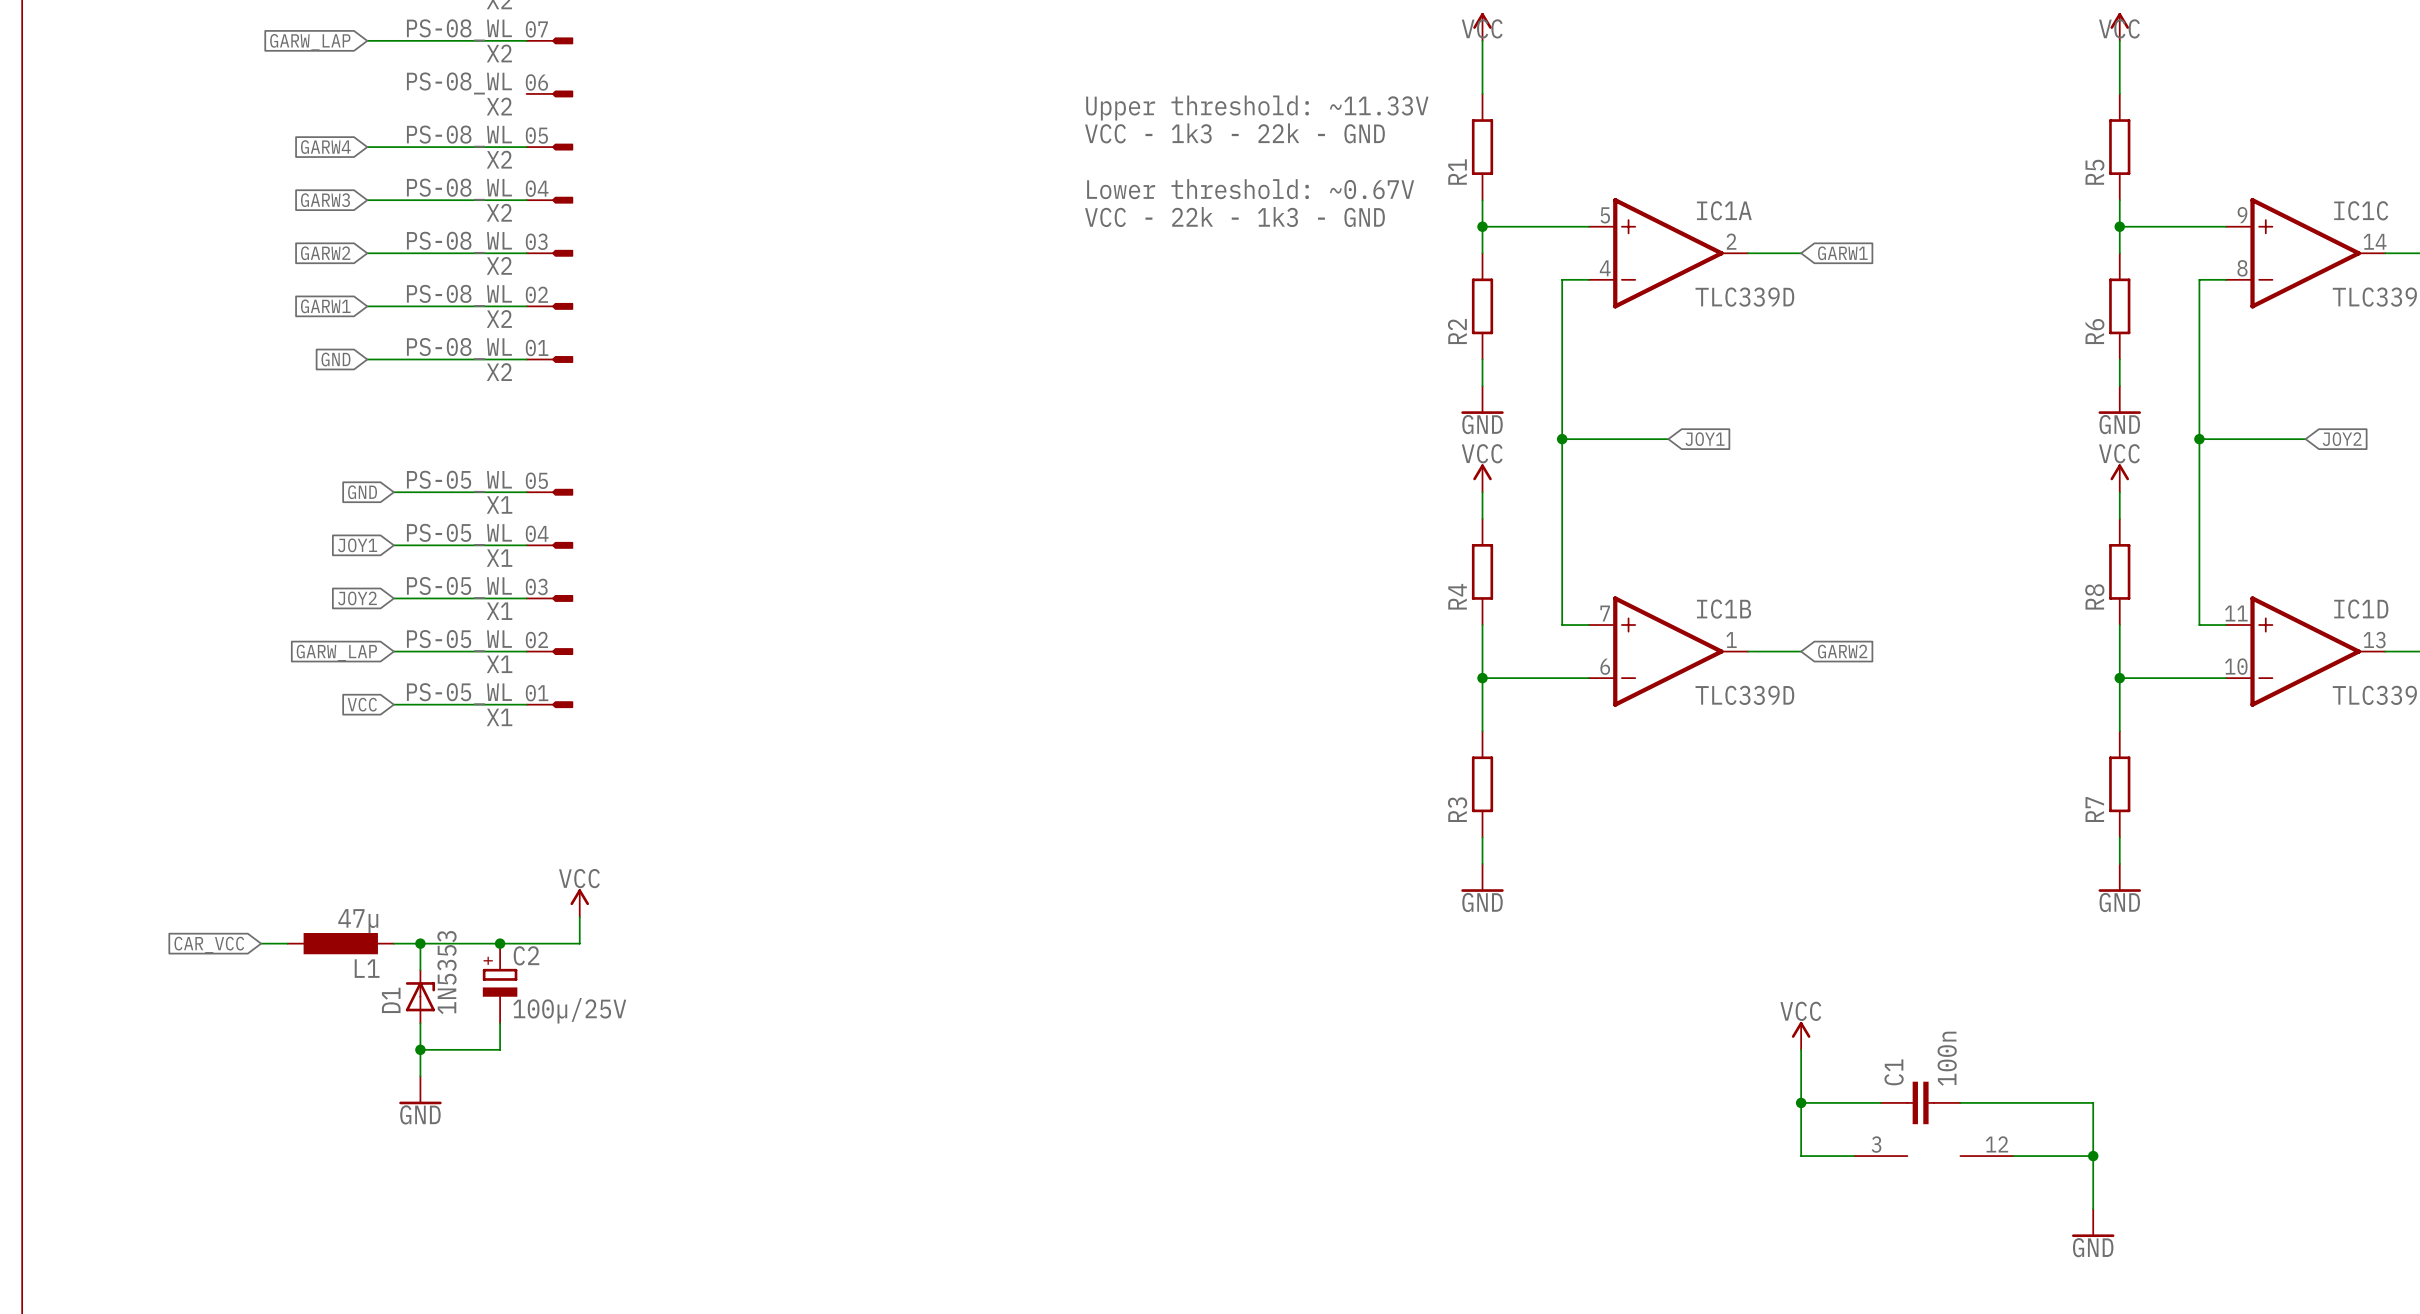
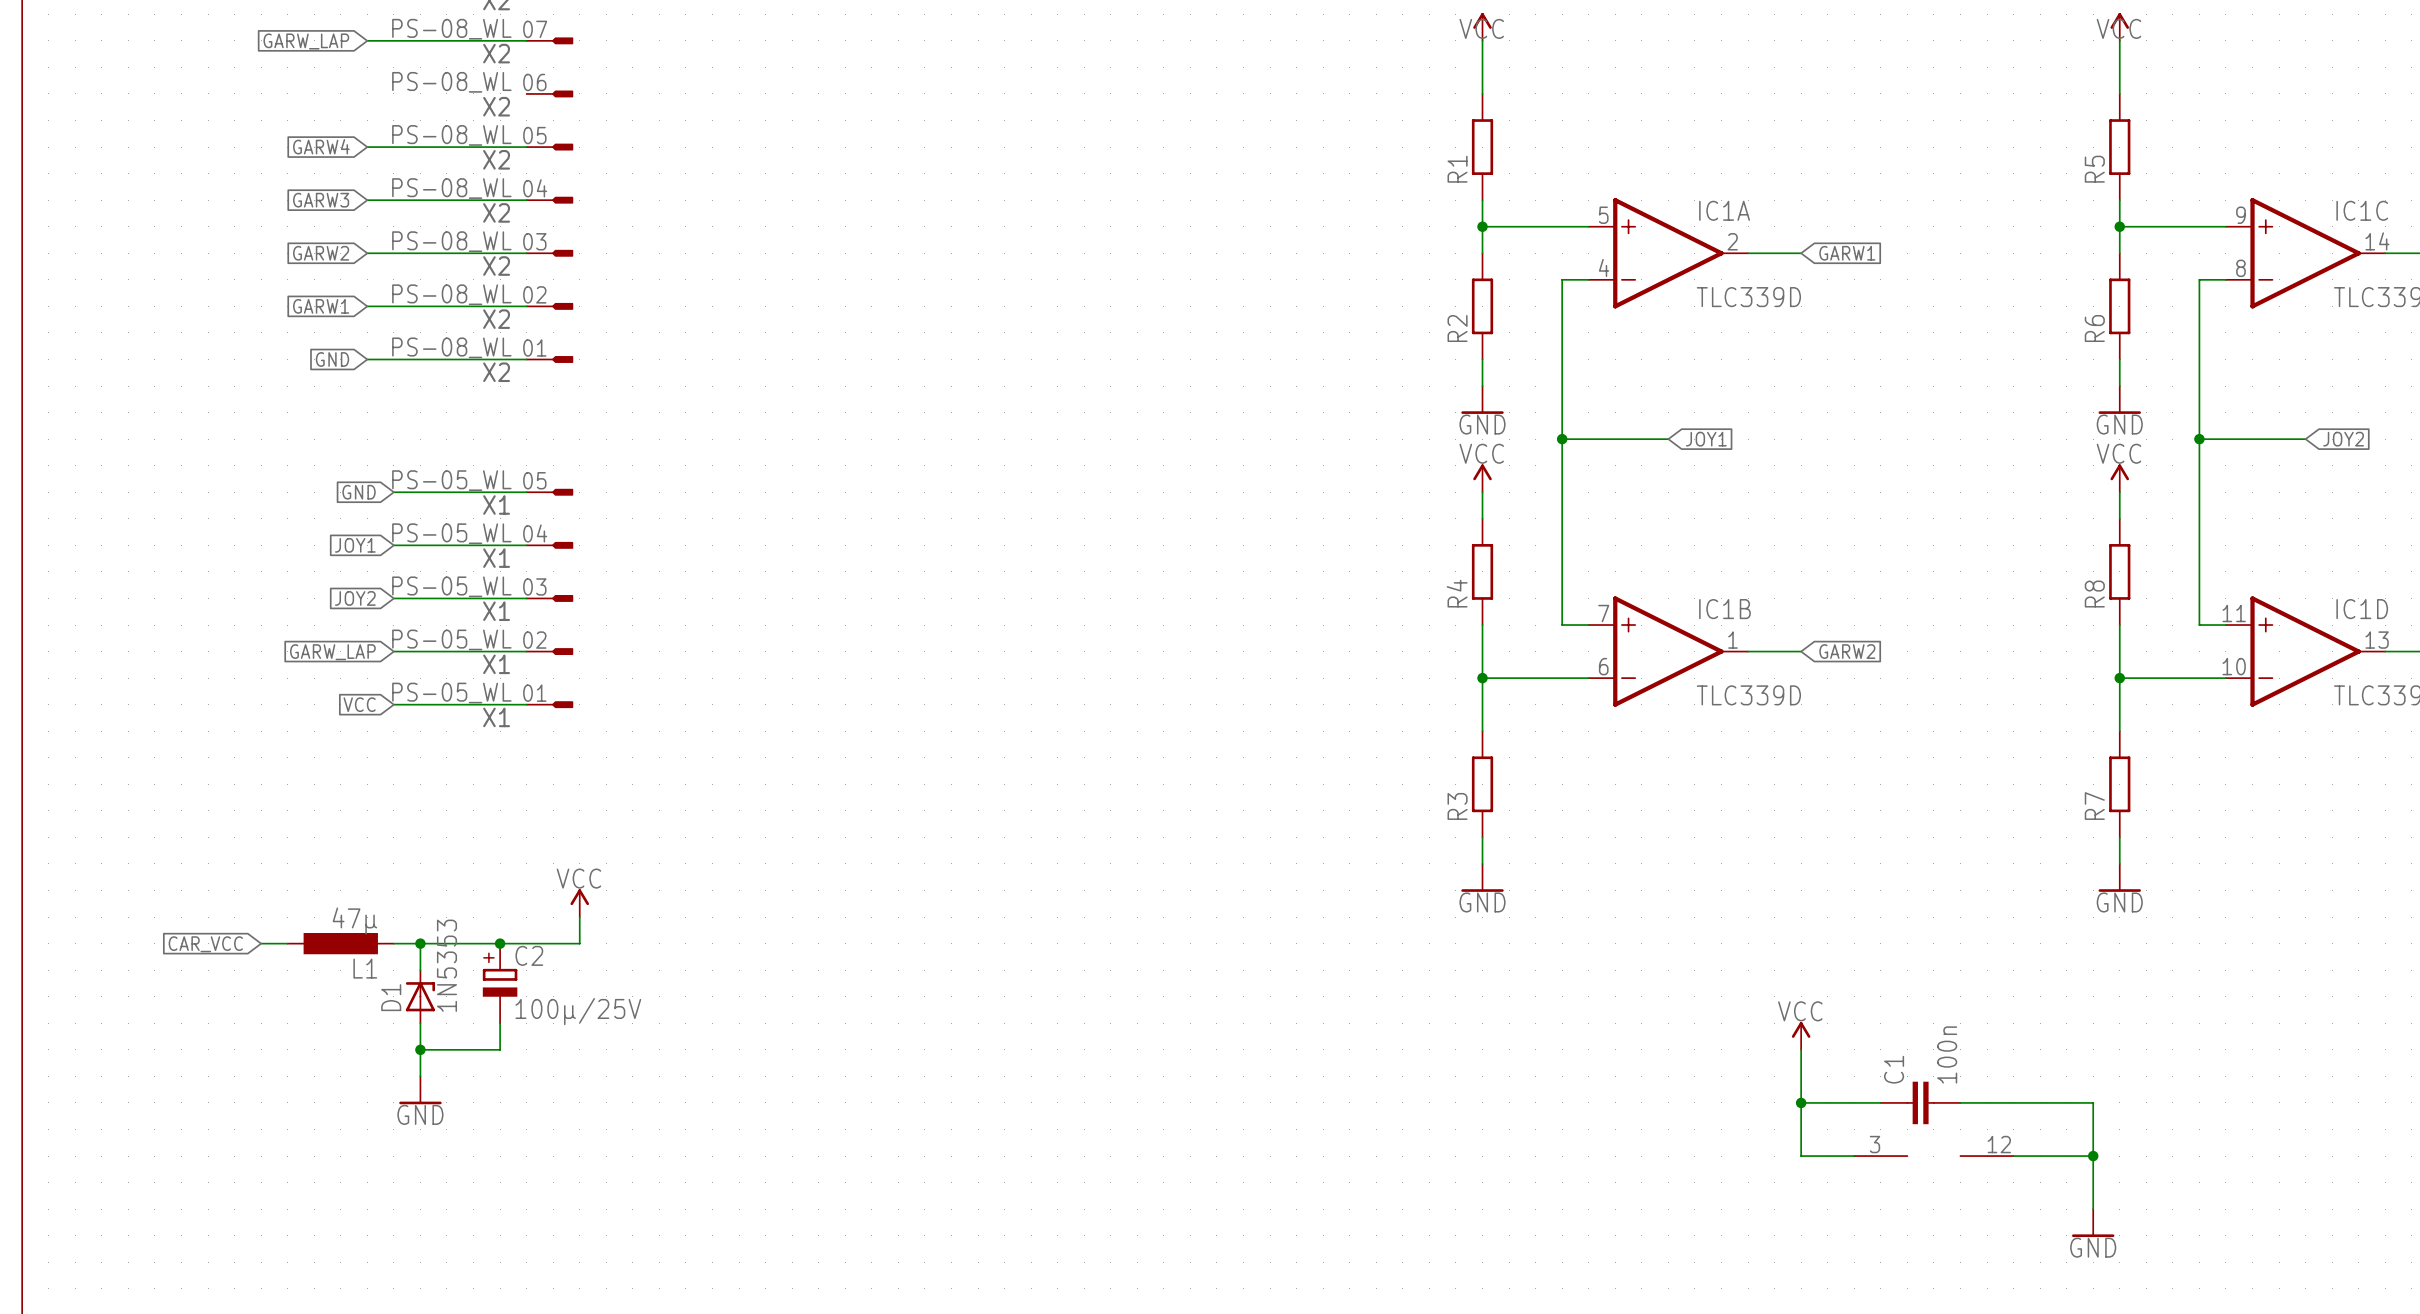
text: Upper threshold: ~11.33V (1257, 108) -> none
text: VCC - 1k3 - 22k - GND (1234, 133) -> none
text: Lower threshold: ~0.67V (1250, 189) -> none
text: VCC - 22k - 1k3 - GND (1234, 217) -> none

